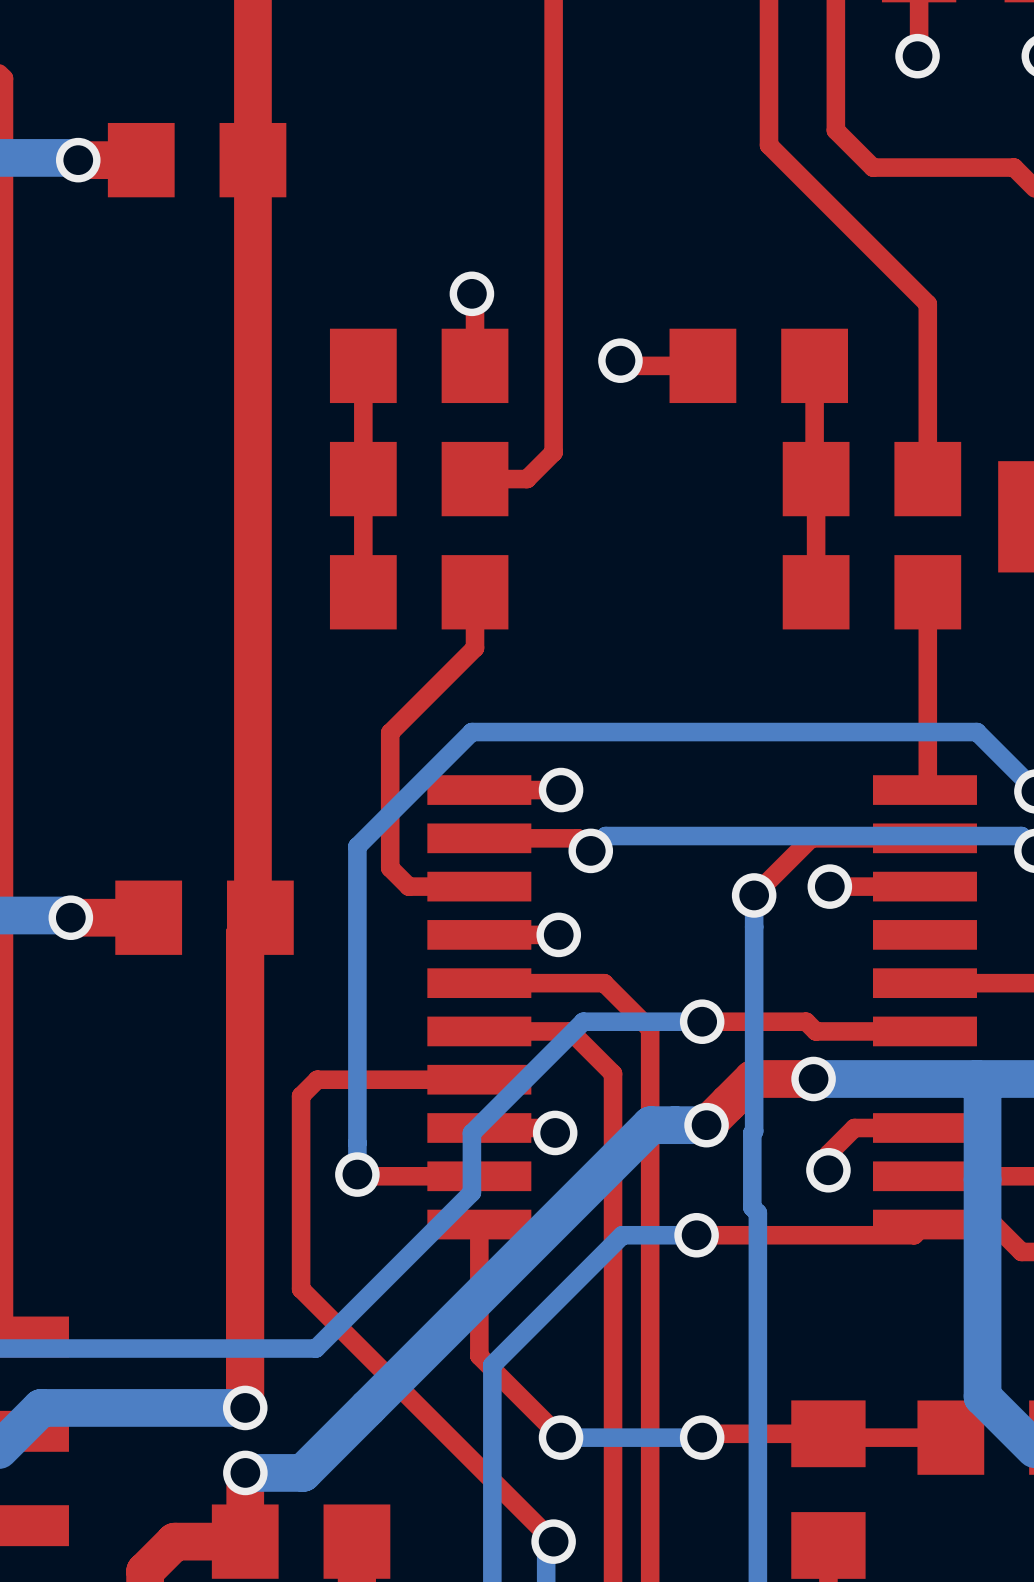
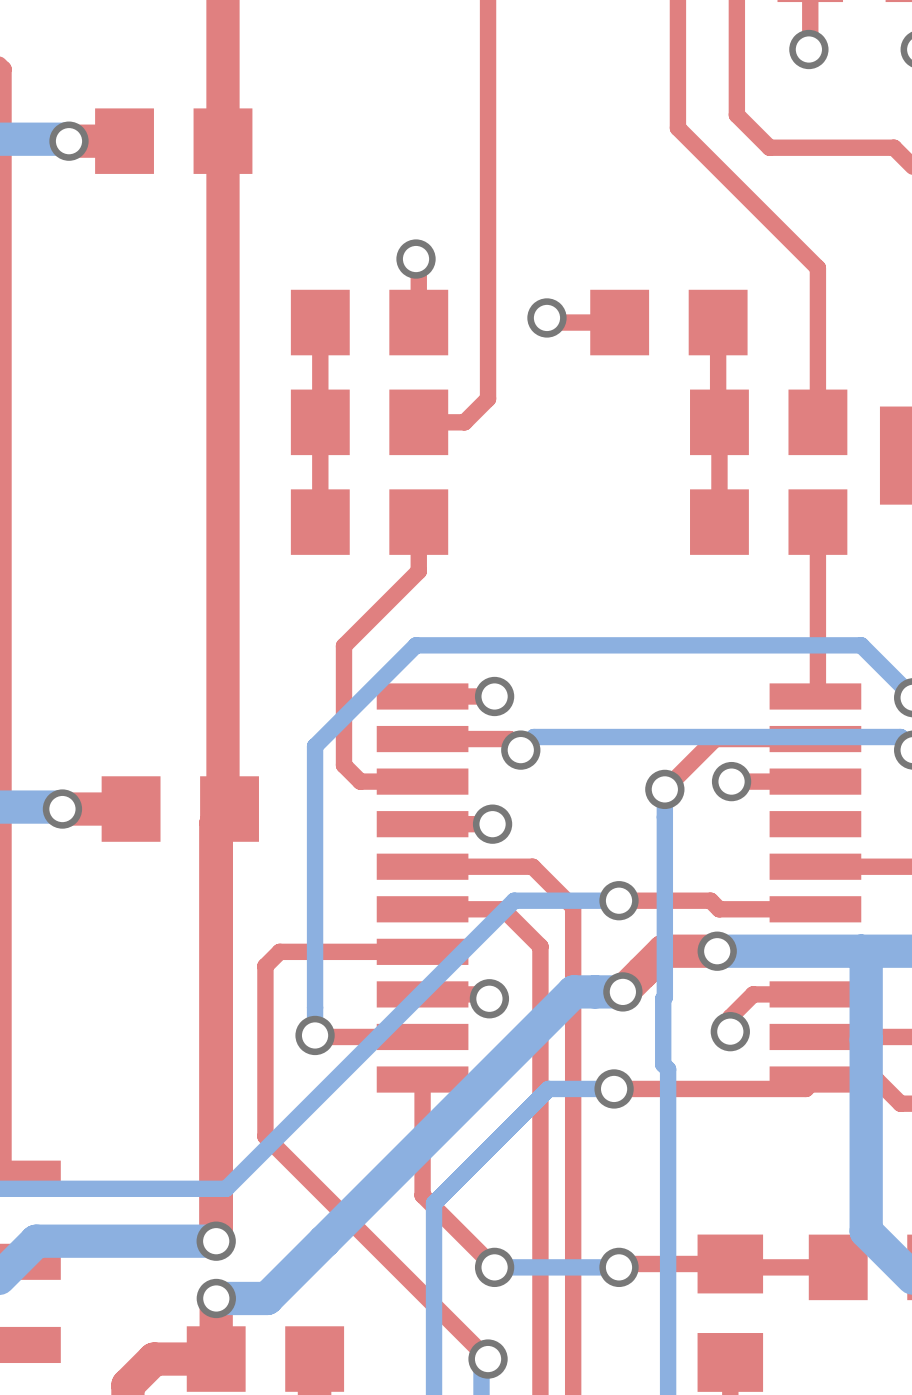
bottom track: (471, 1133) (471, 1192) (315, 1348) (256, 1348) -> (416, 998) (226, 1188)

